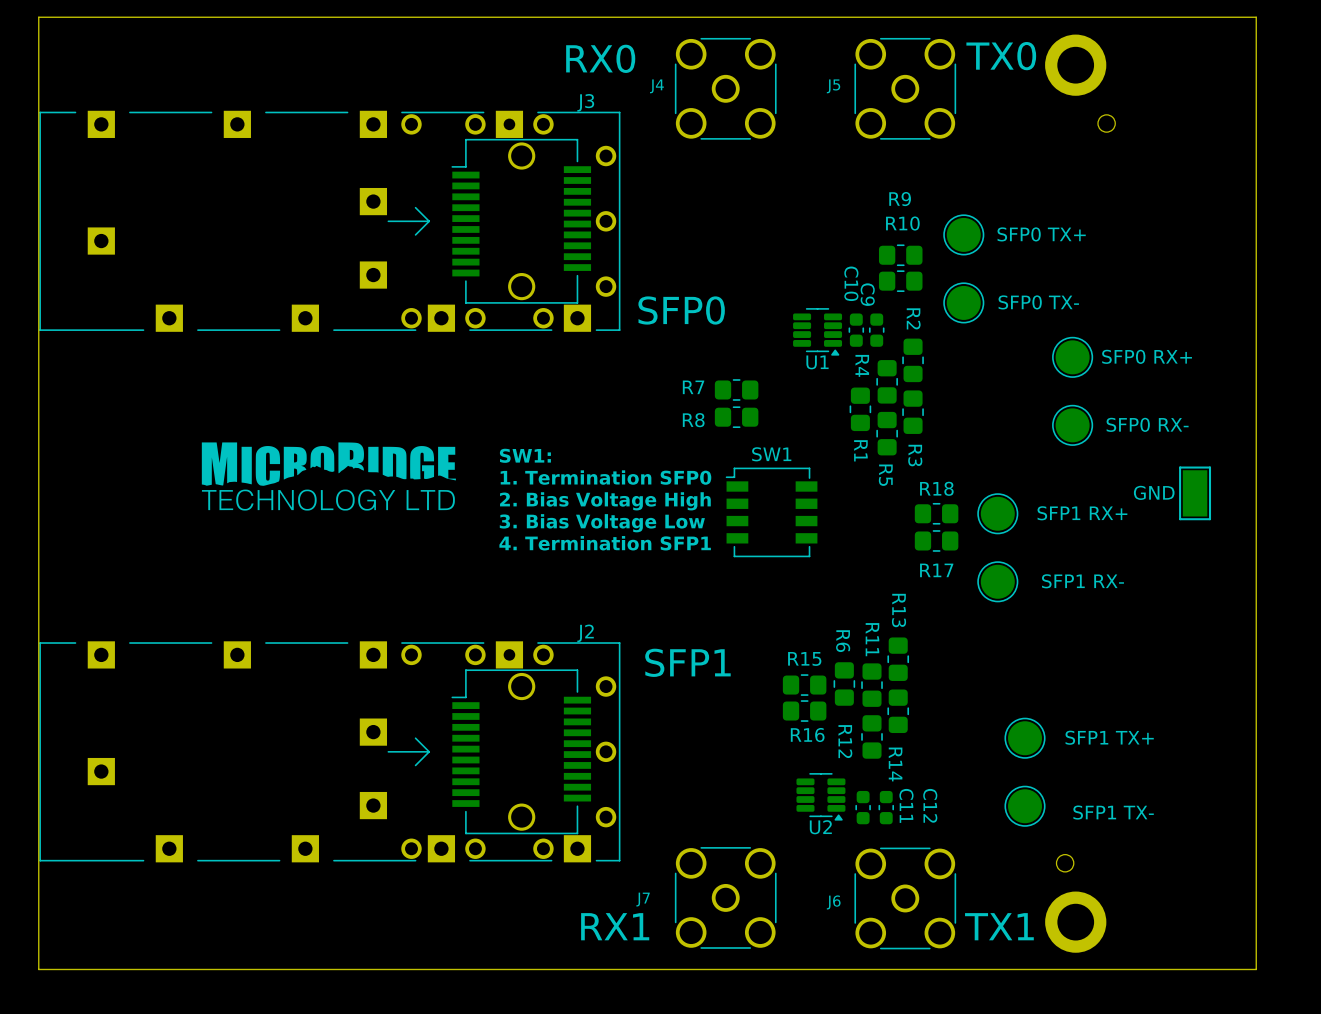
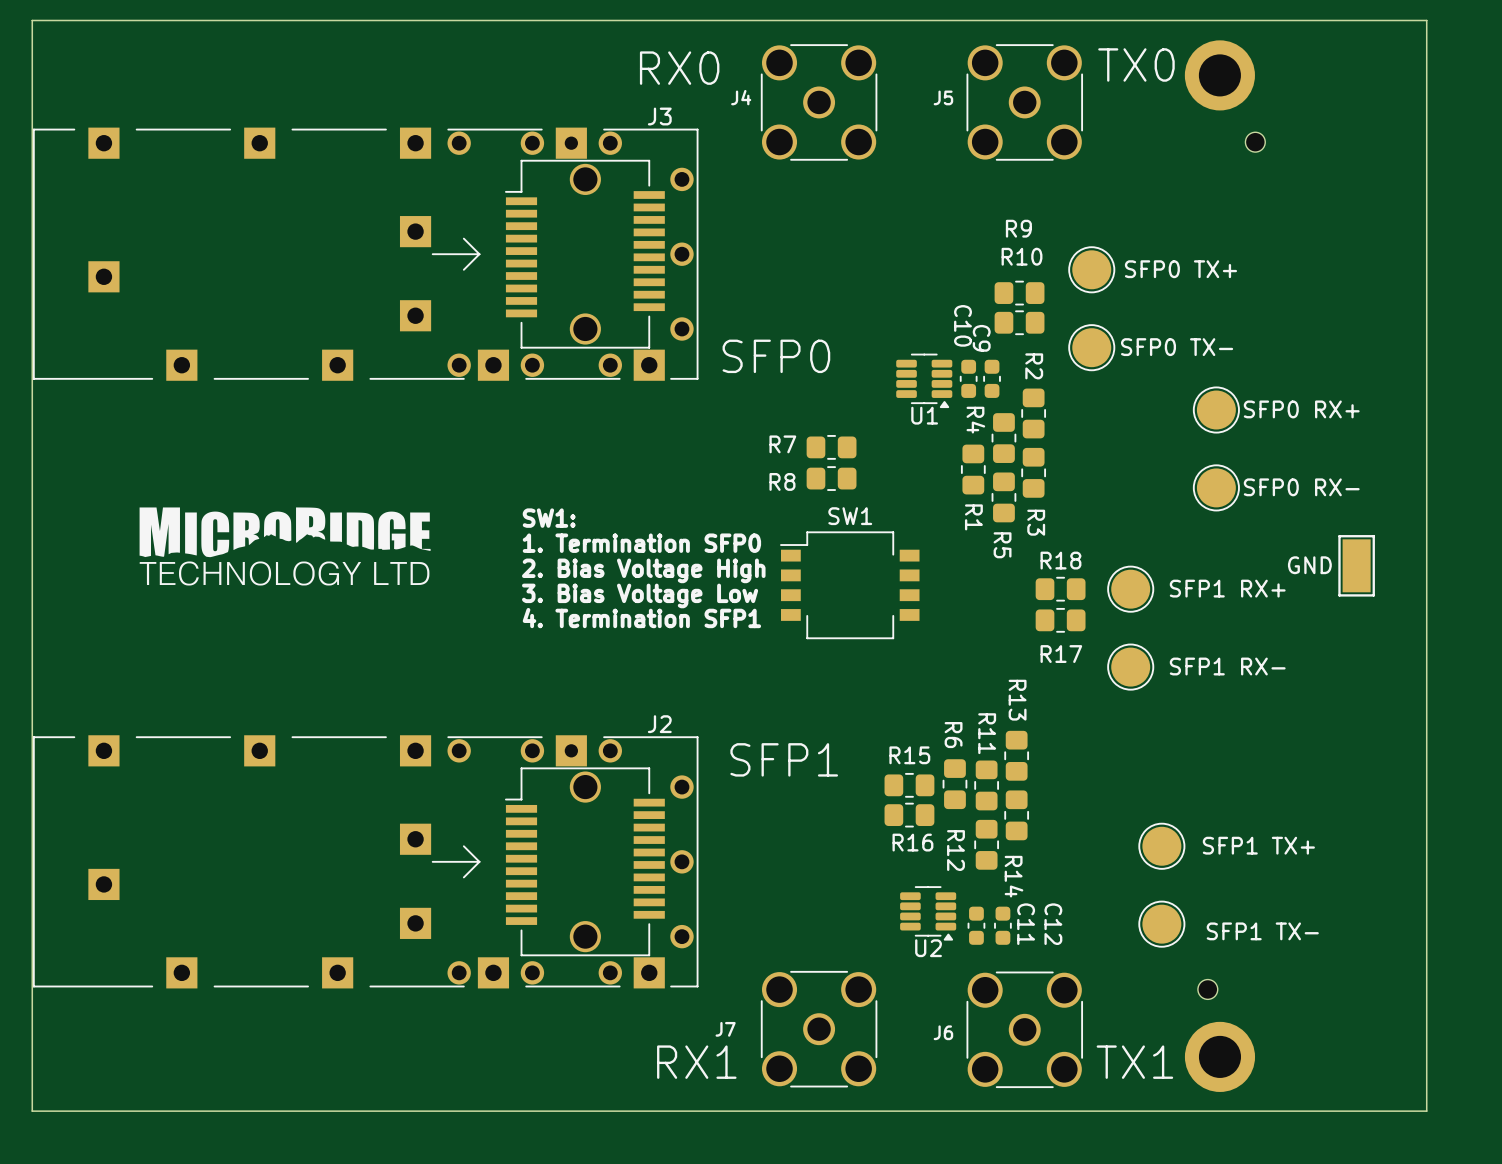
text position: SW1: (525, 455) -> SW1: (549, 518)
SW1 footprint: [725, 467, 818, 558] -> [780, 531, 920, 640]
drawing position: (328, 476) -> (285, 546)
text position: 1. Termination SFP0 (605, 477) -> 1. Termination SFP0 (641, 543)
text position: 2. Bias Voltage High (605, 501) -> 2. Bias Voltage High (643, 570)
text position: 3. Bias Voltage Low (602, 523) -> 3. Bias Voltage Low (640, 595)
text position: 4. Termination SFP1 (605, 543) -> 4. Termination SFP1 (641, 618)

